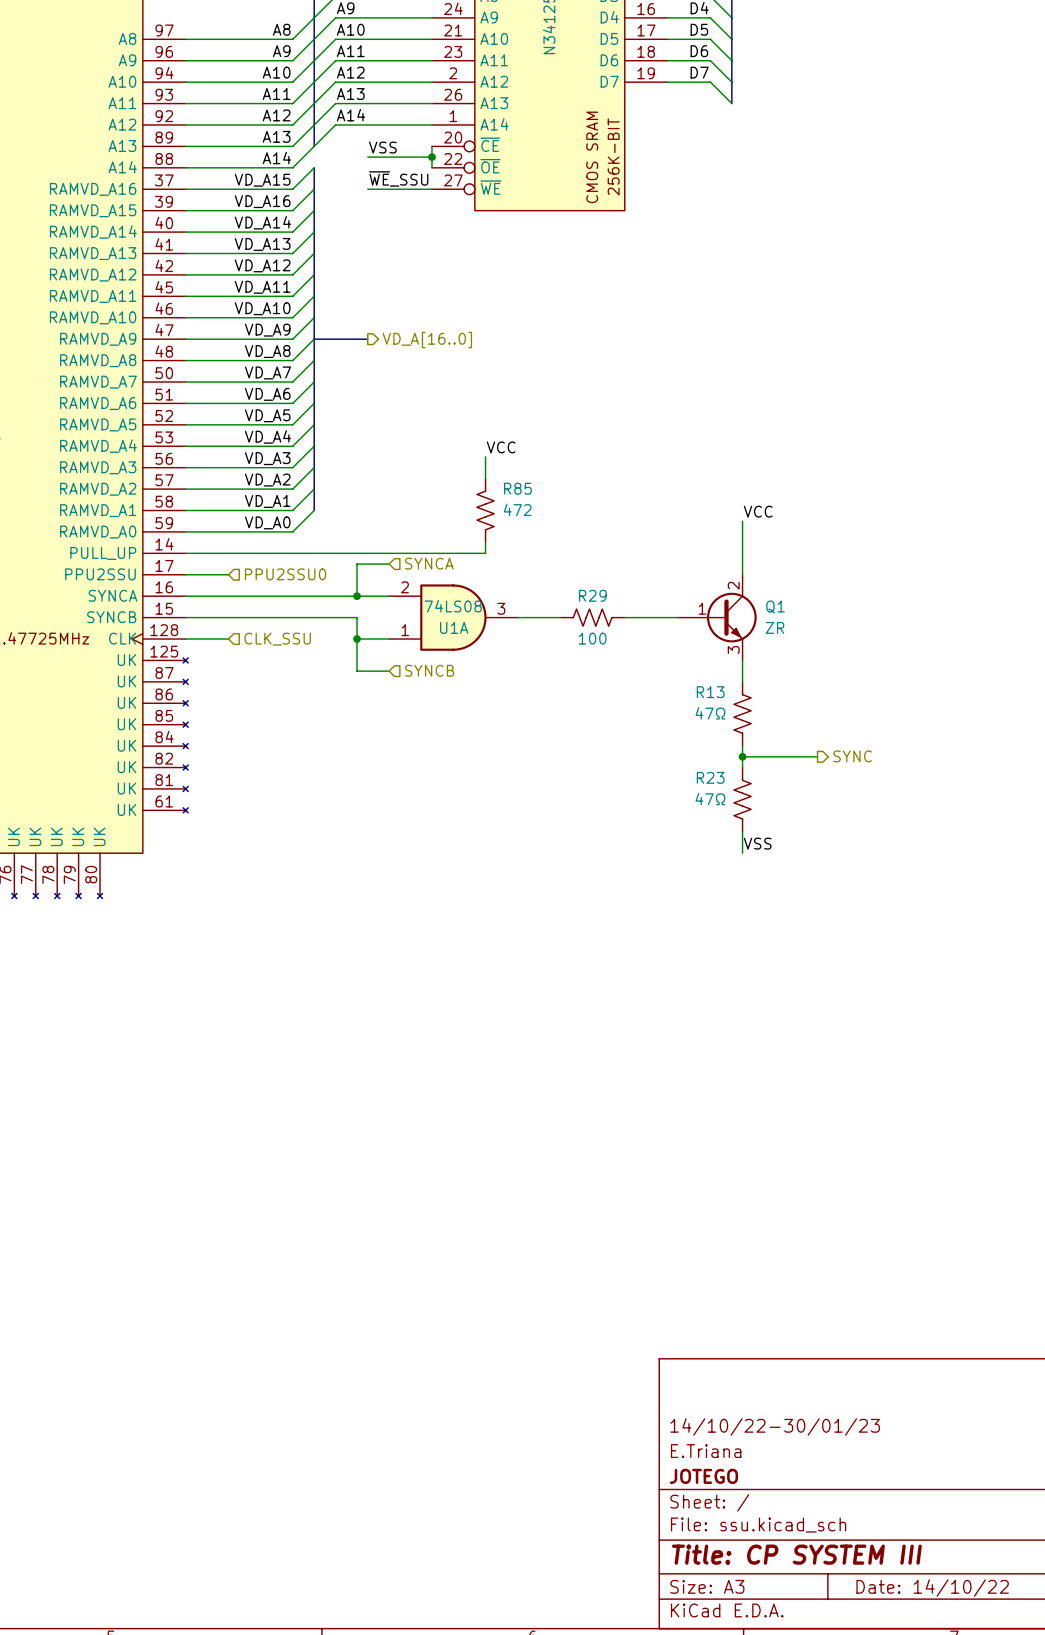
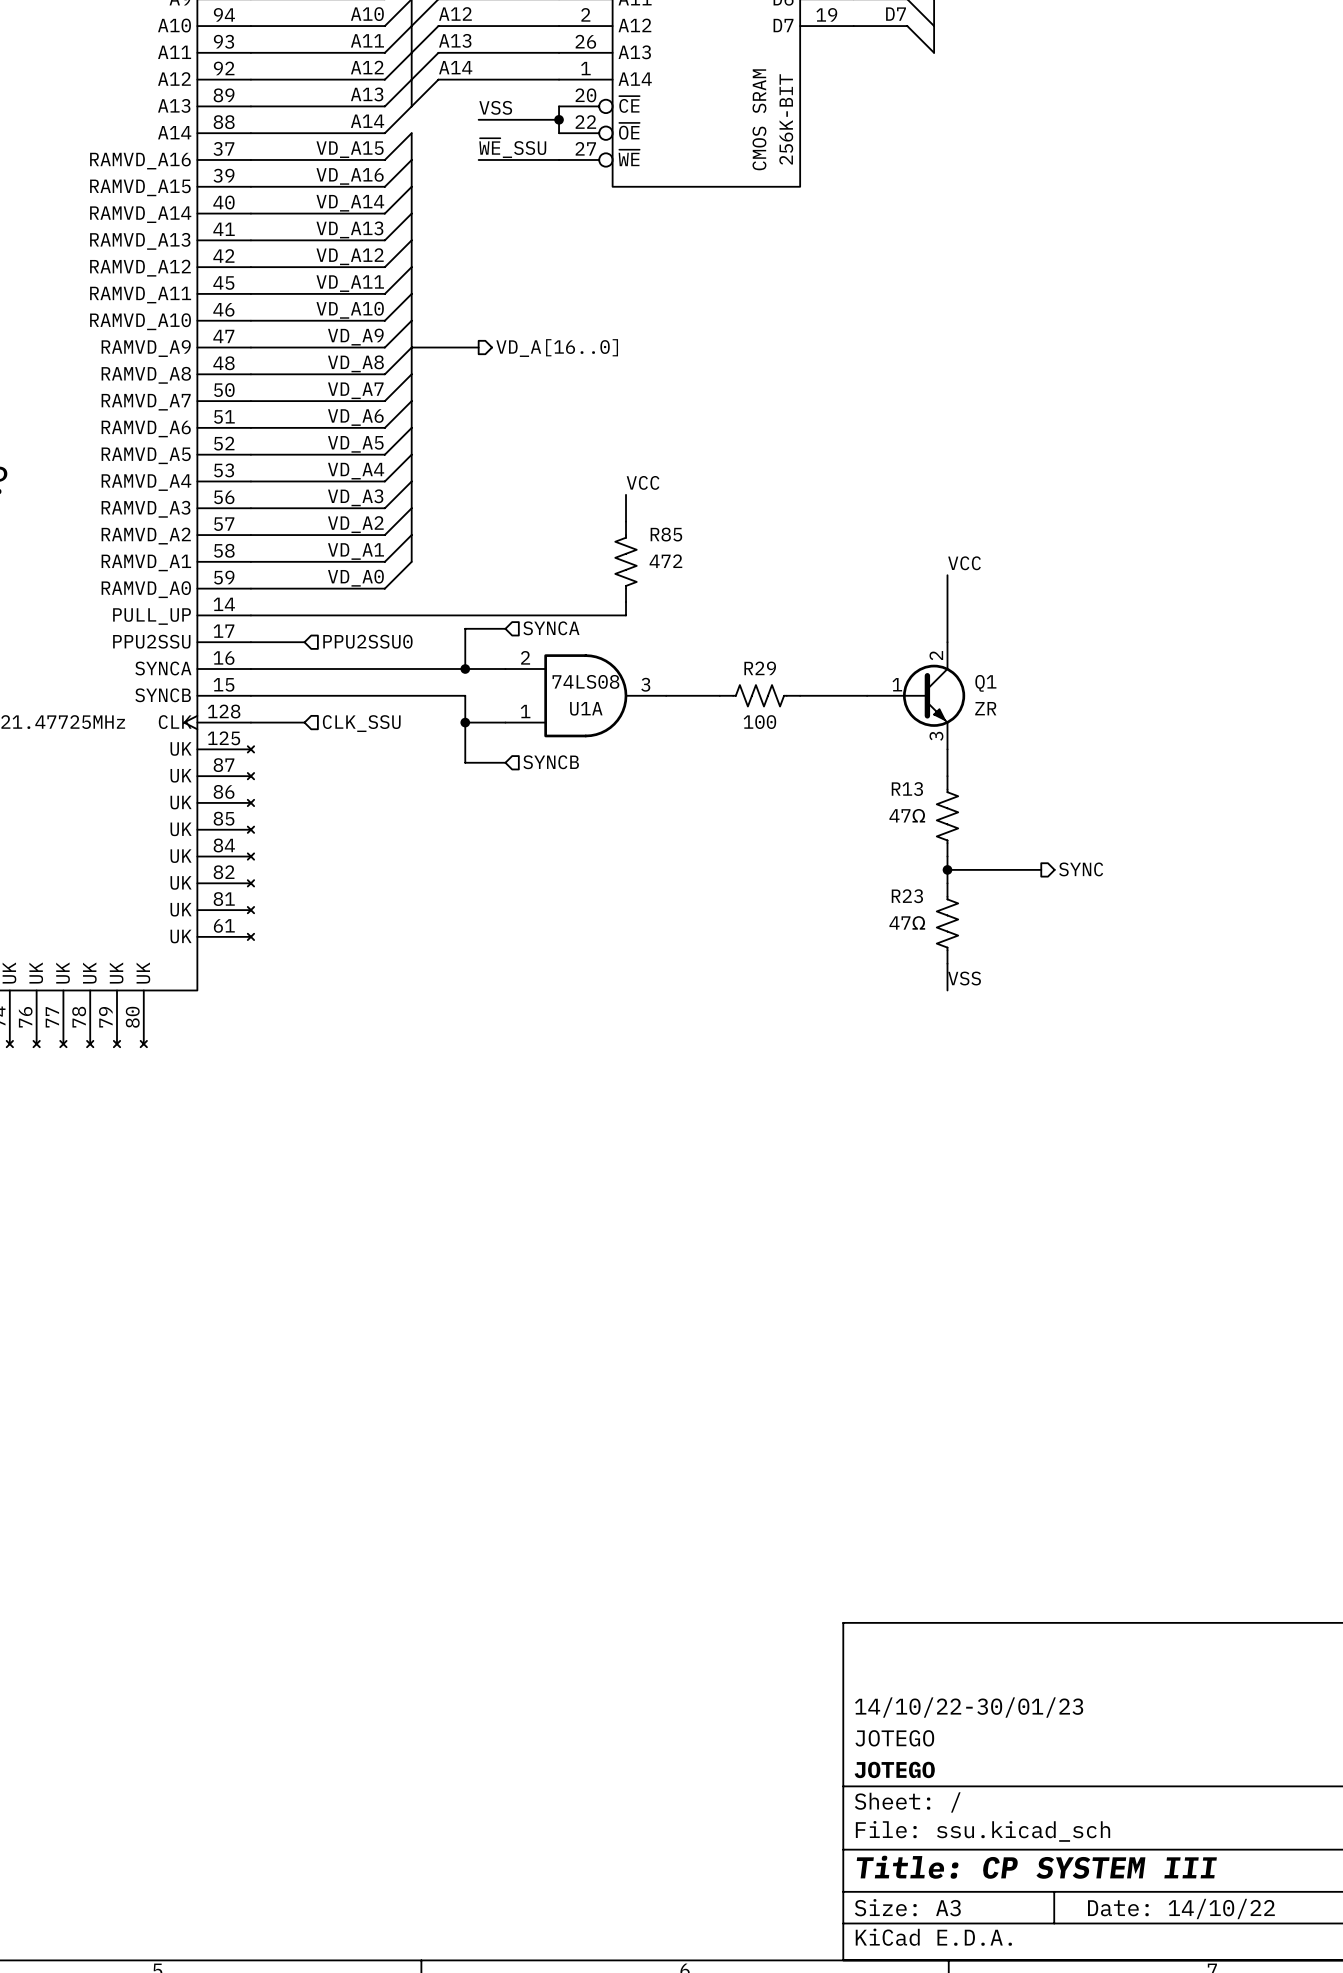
title block: E.Triana (706, 1451) -> JOTEGO (894, 1738)

